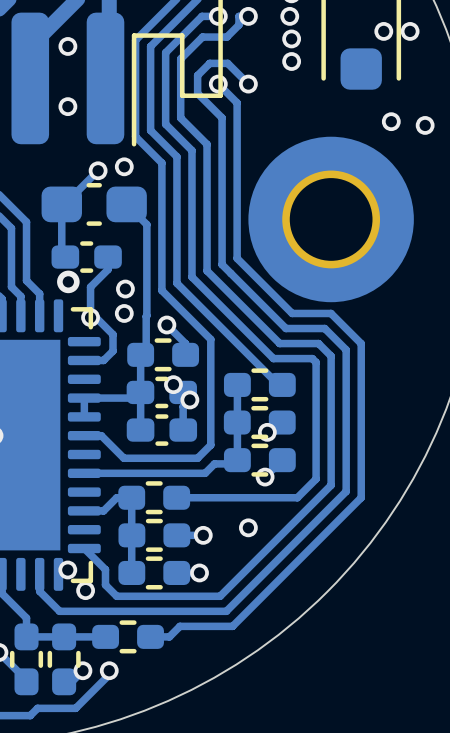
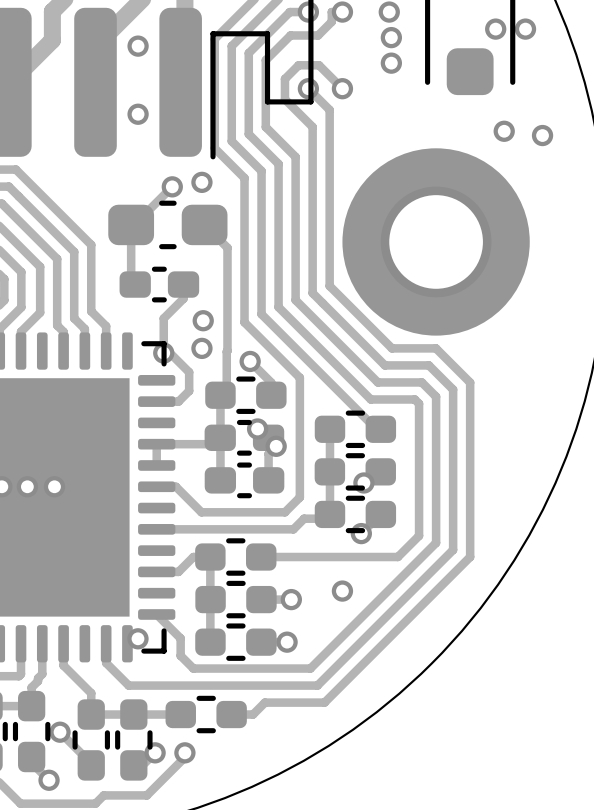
via: (68, 281) -> none
via: (85, 590) -> none

